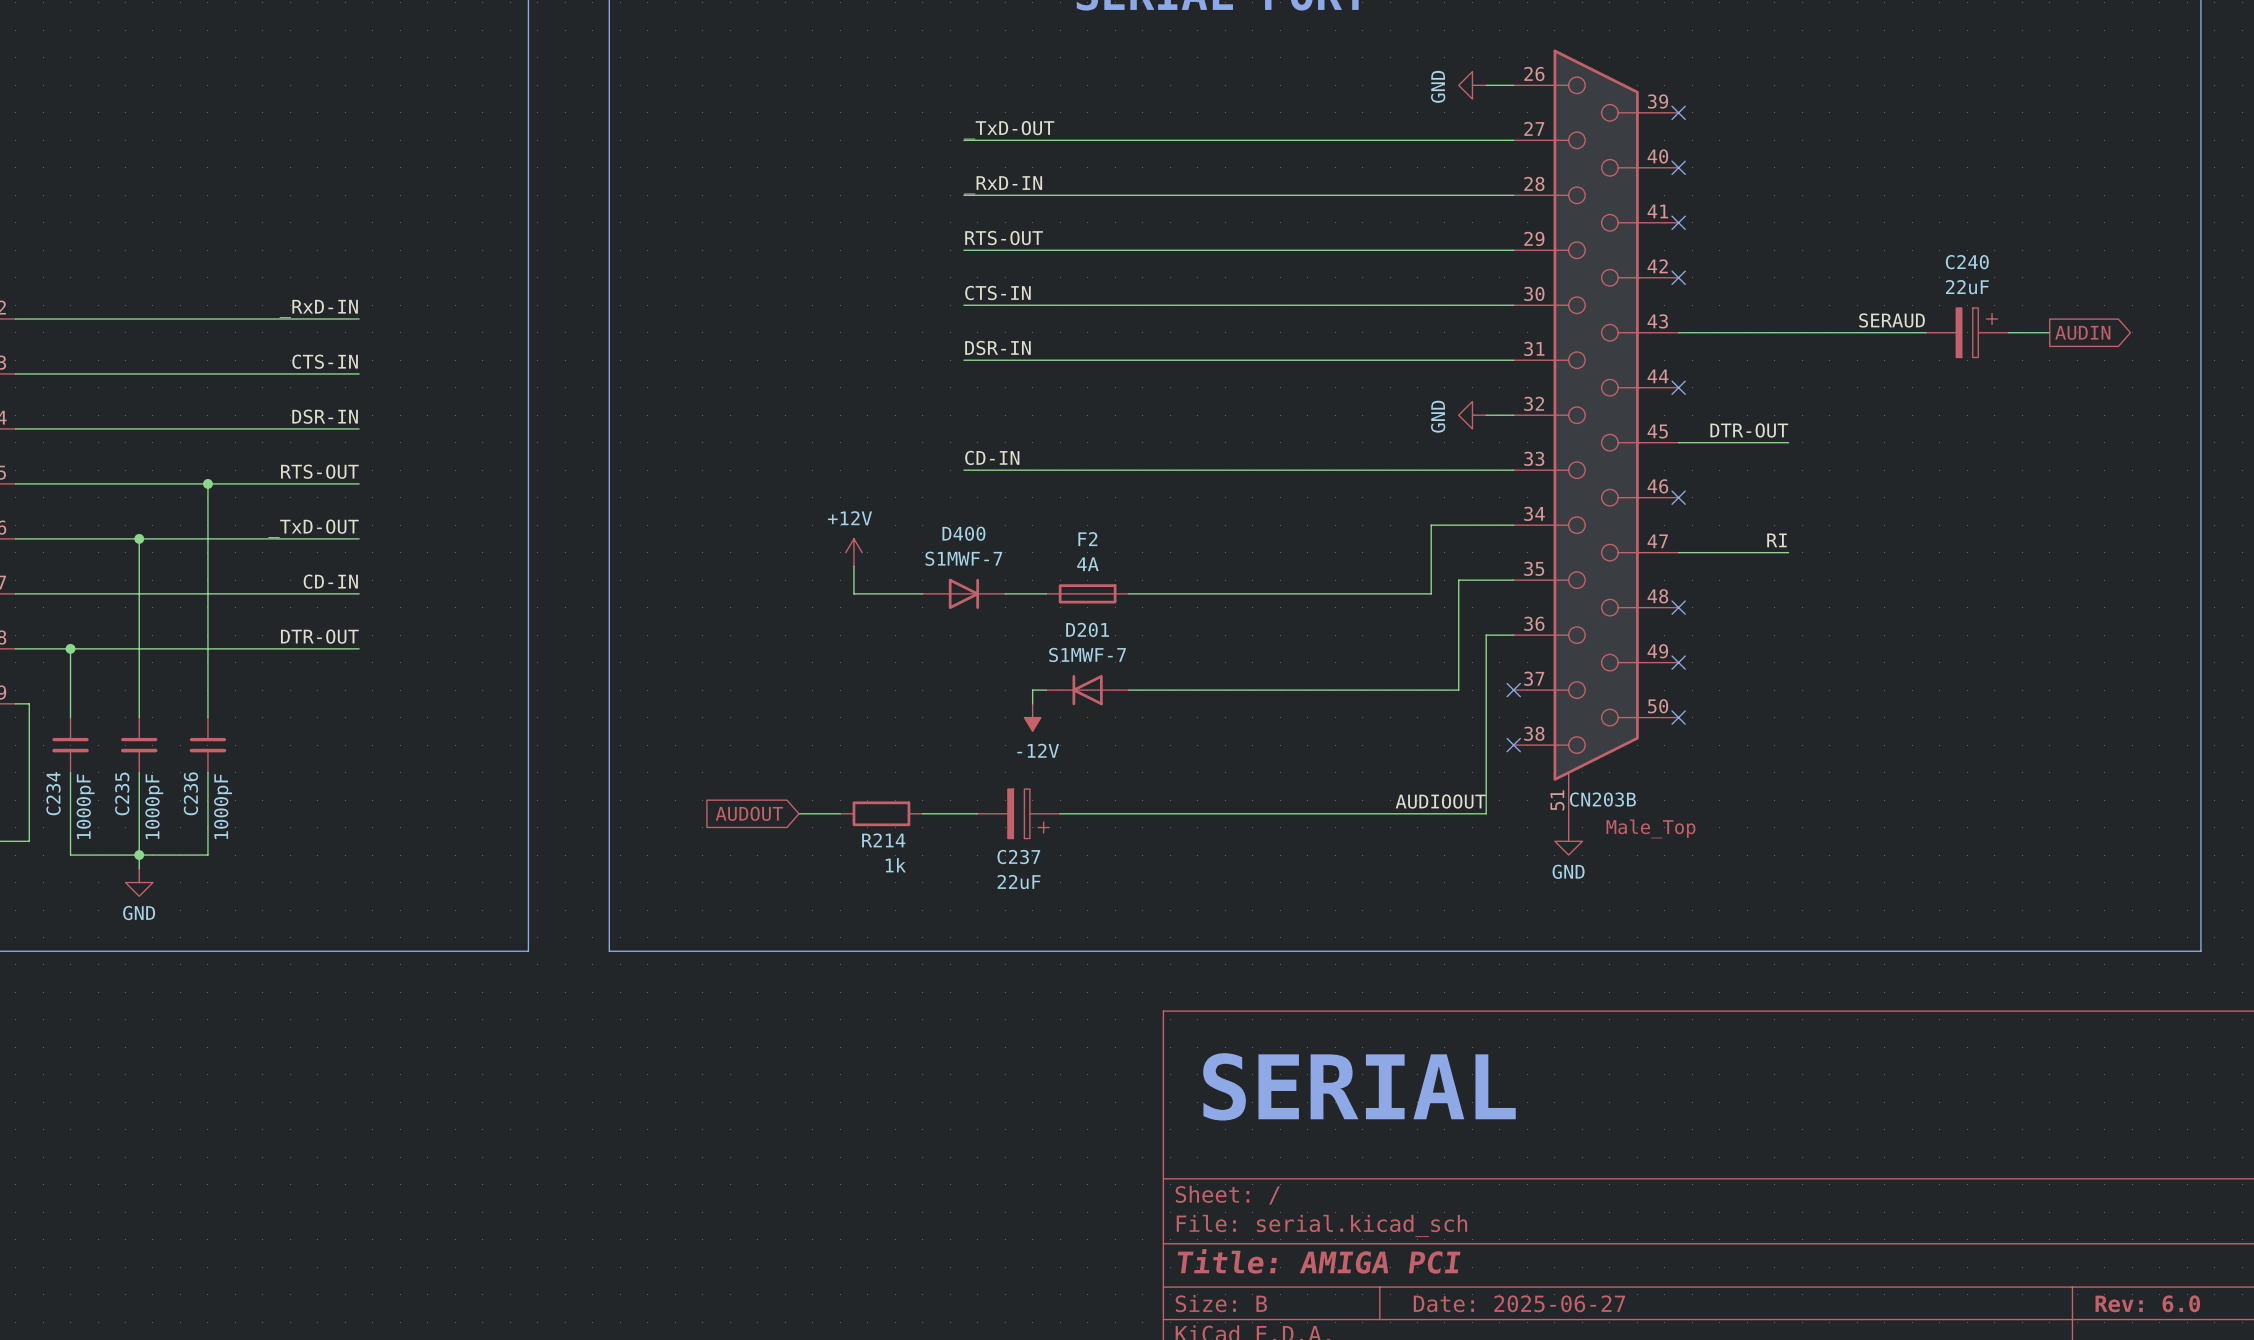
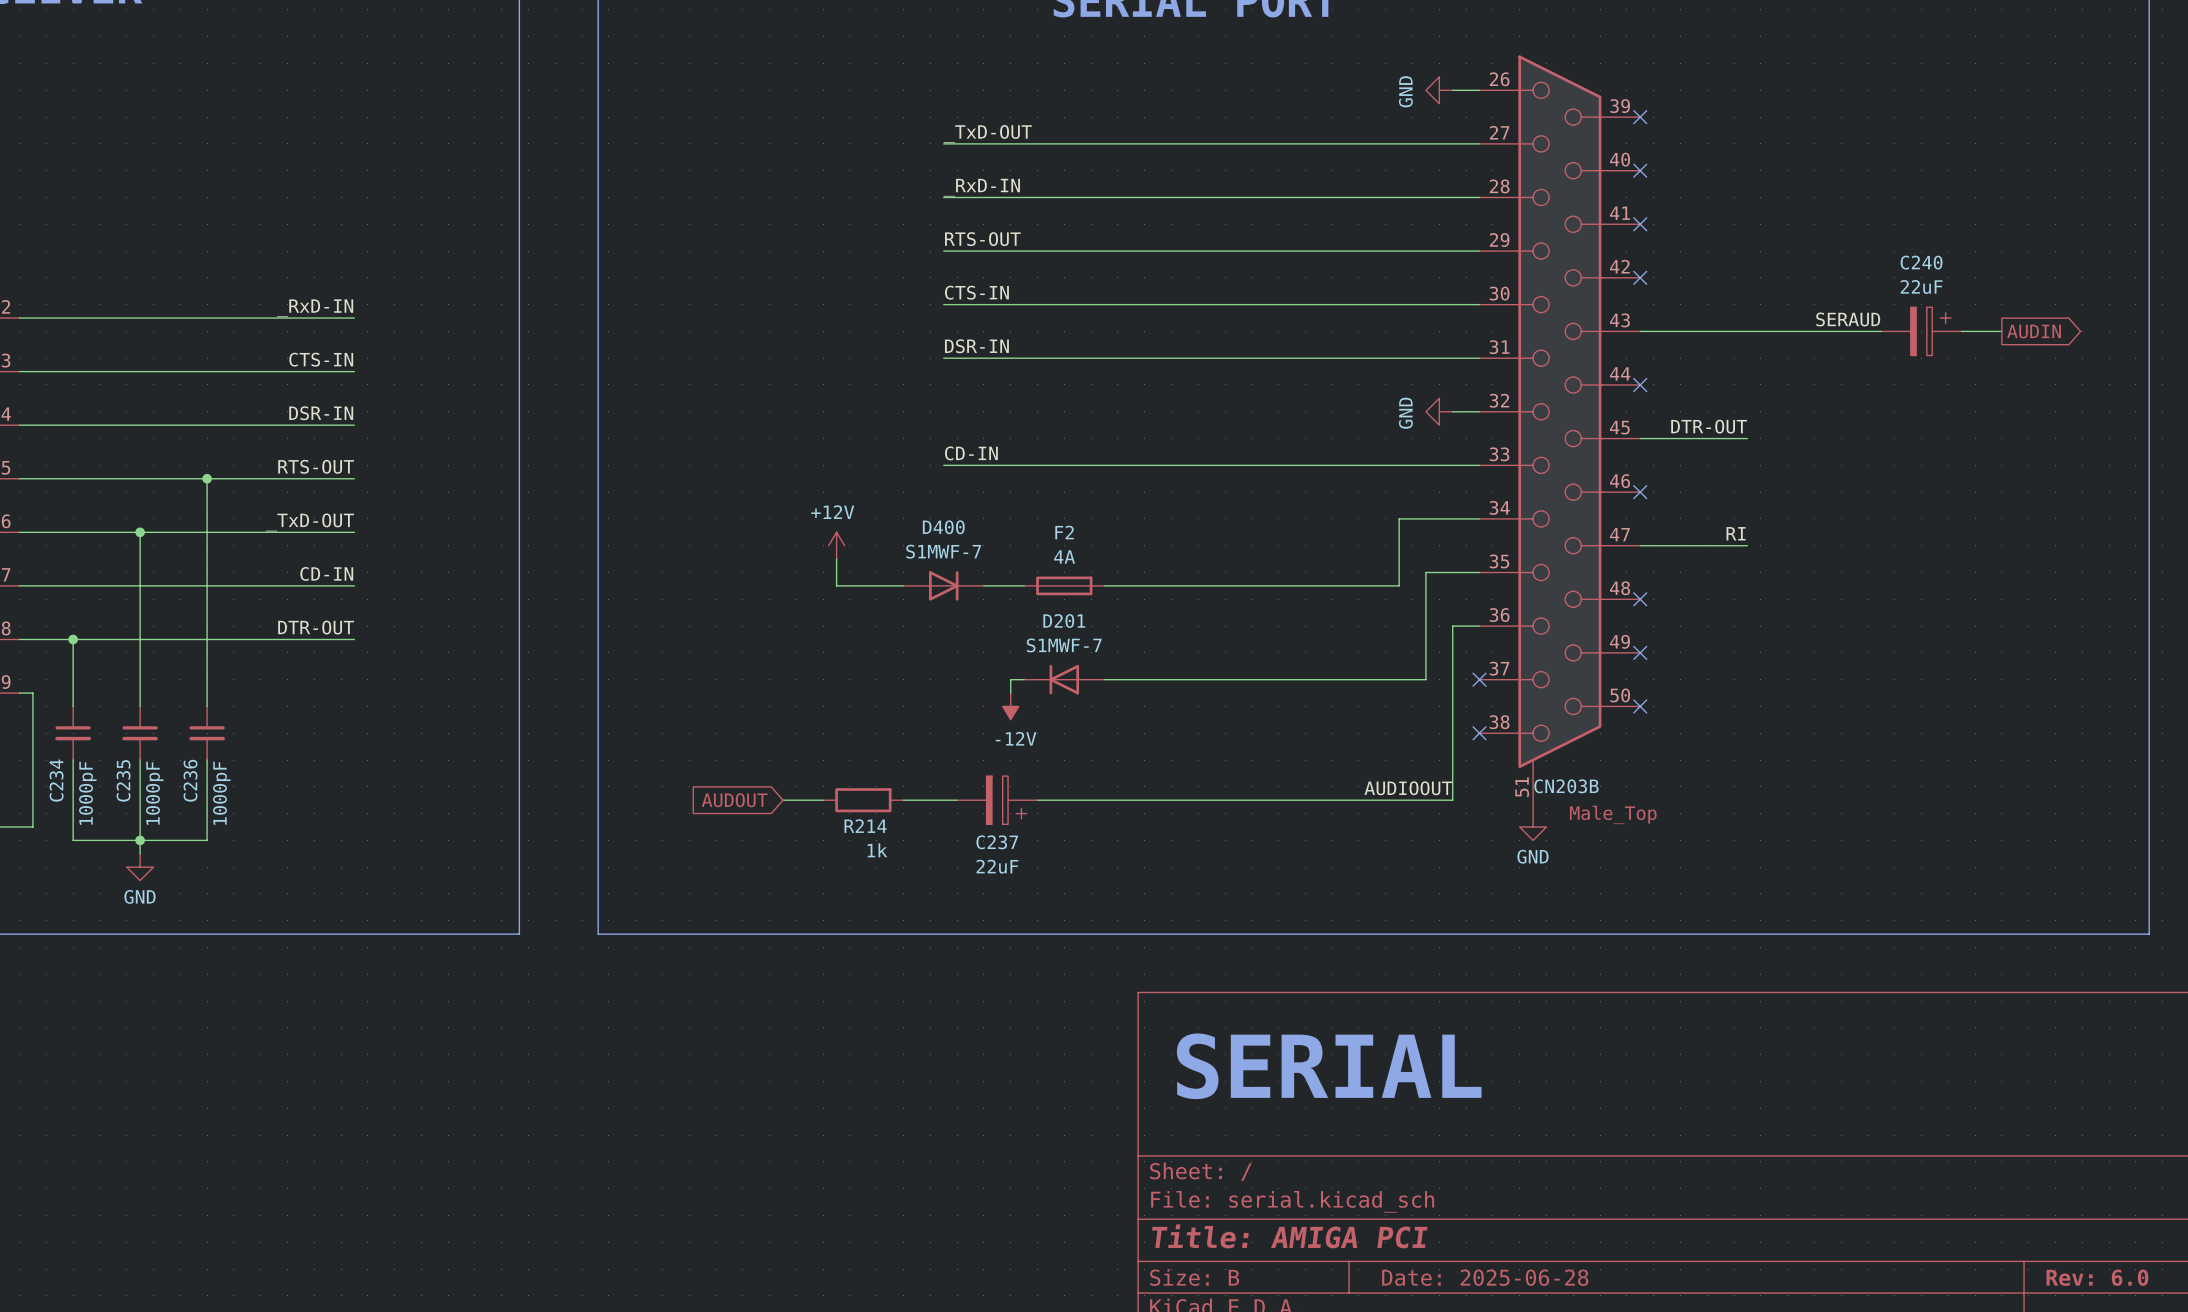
title block: Date: 2025-06-27 (1519, 1303) -> Date: 2025-06-28 (1485, 1277)

